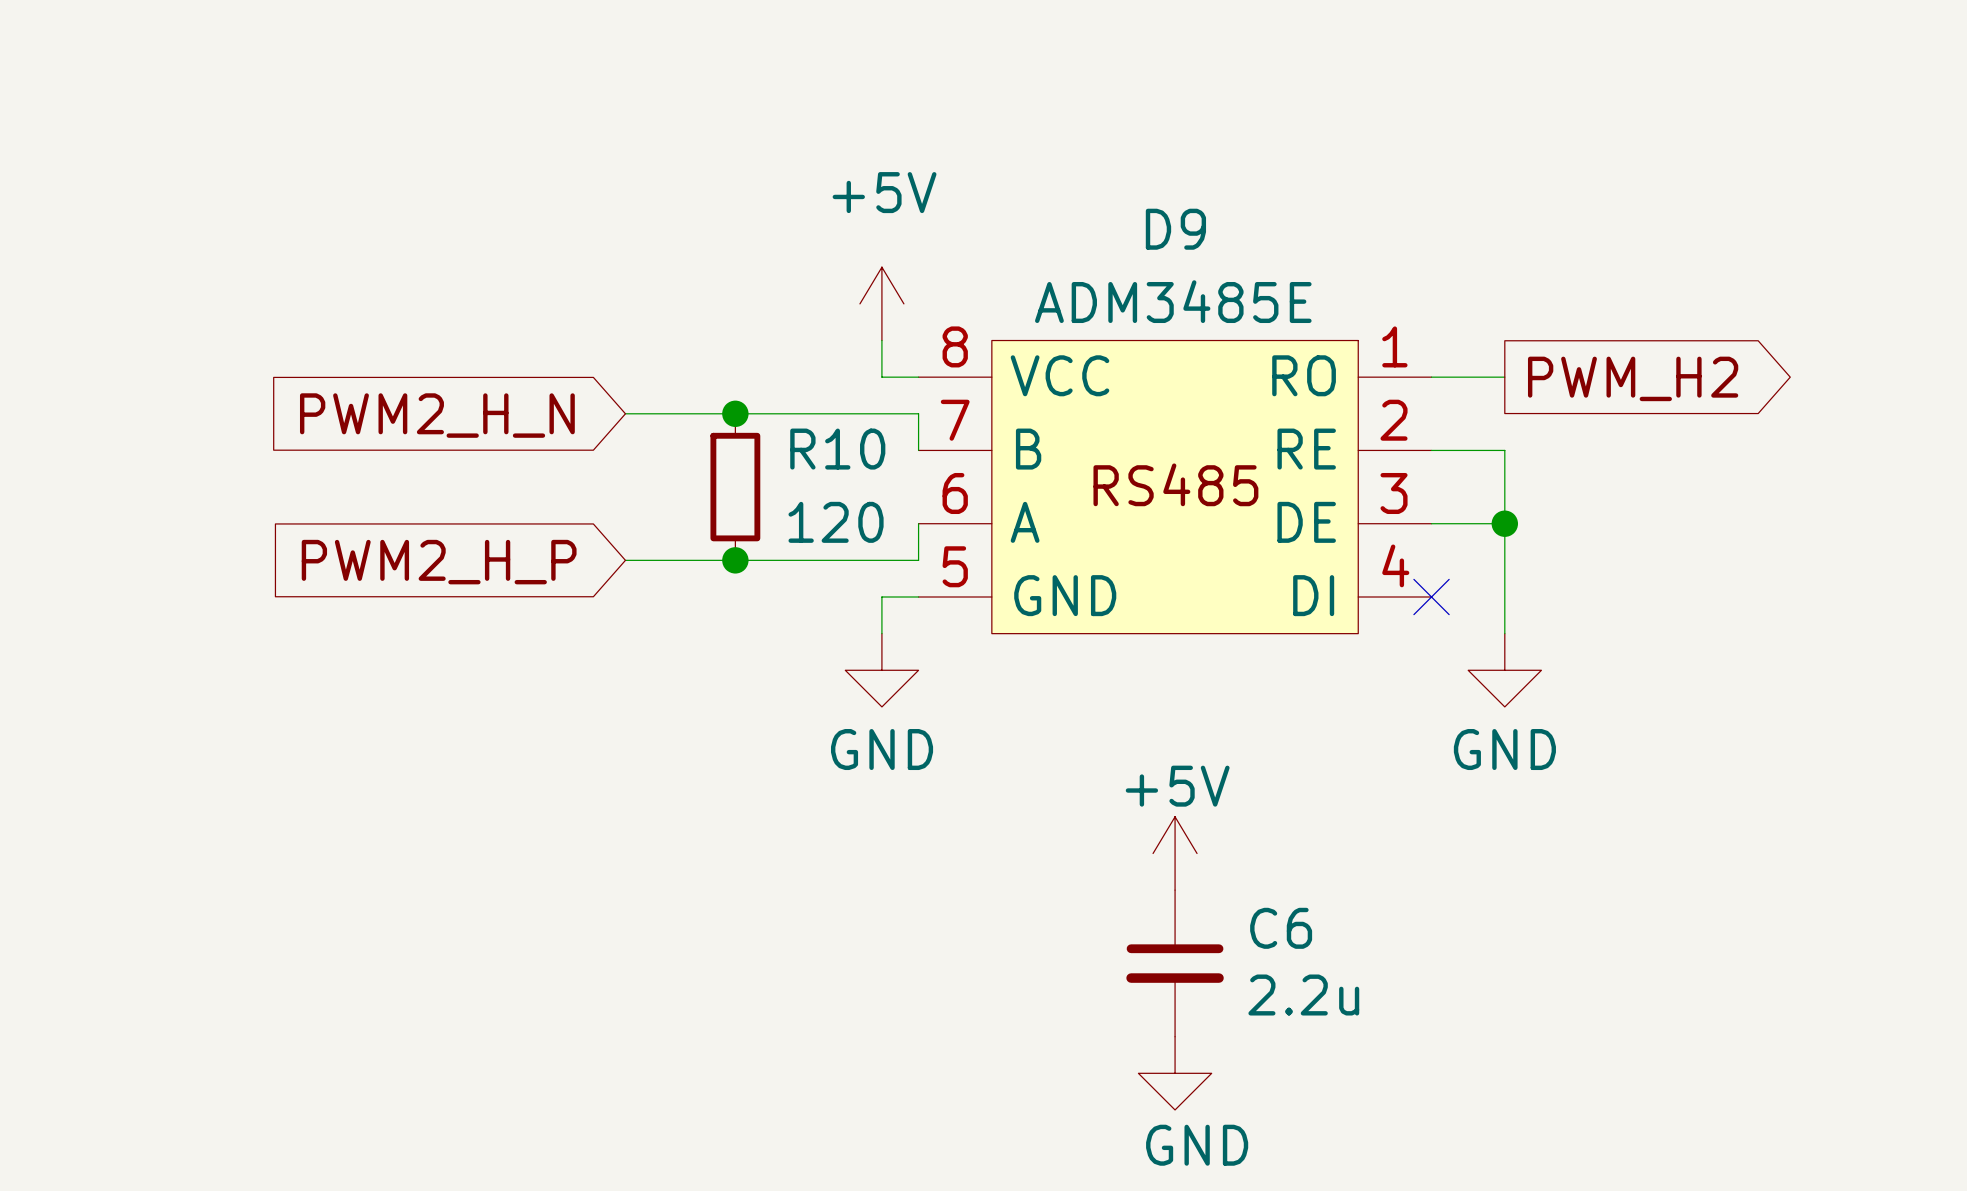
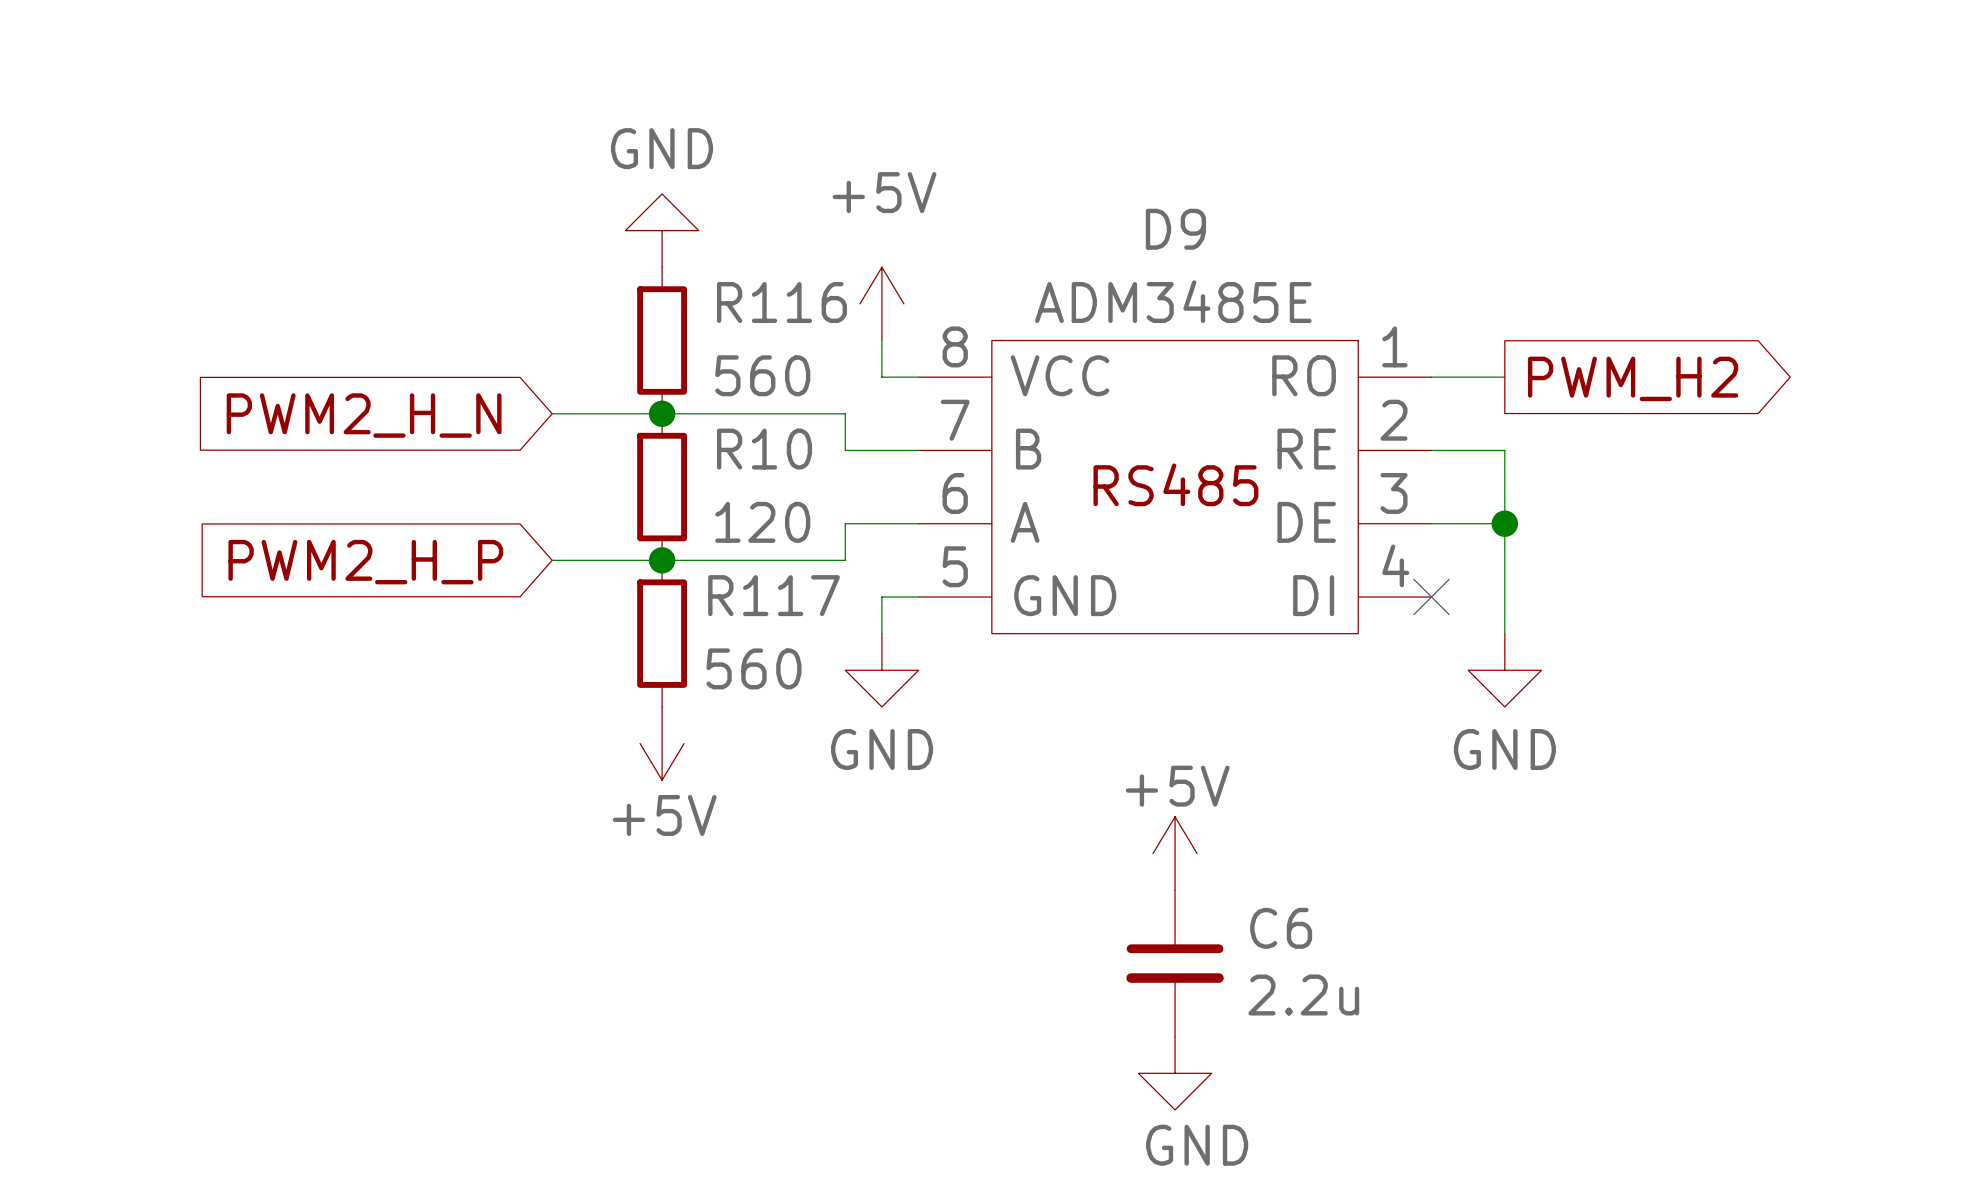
power symbol: none -> GND (662, 230)
R116: none -> 560 (662, 340)
wire: none -> (552, 413) (625, 413)
junction position: (735, 413) -> (662, 413)
wire: (845, 413) (918, 413) (918, 450) -> (845, 413) (845, 450) (918, 450)
global label position: PWM2_H_N (437, 415) -> PWM2_H_N (364, 415)
R10 position: (735, 487) -> (662, 487)
wire: (918, 523) (918, 560) (845, 560) -> (918, 523) (845, 523) (845, 560)
wire: none -> (552, 560) (625, 560)
junction position: (735, 560) -> (662, 560)
global label position: PWM2_H_P (439, 562) -> PWM2_H_P (365, 562)
R117: none -> 560 (662, 633)
power symbol: none -> +5V (662, 743)

